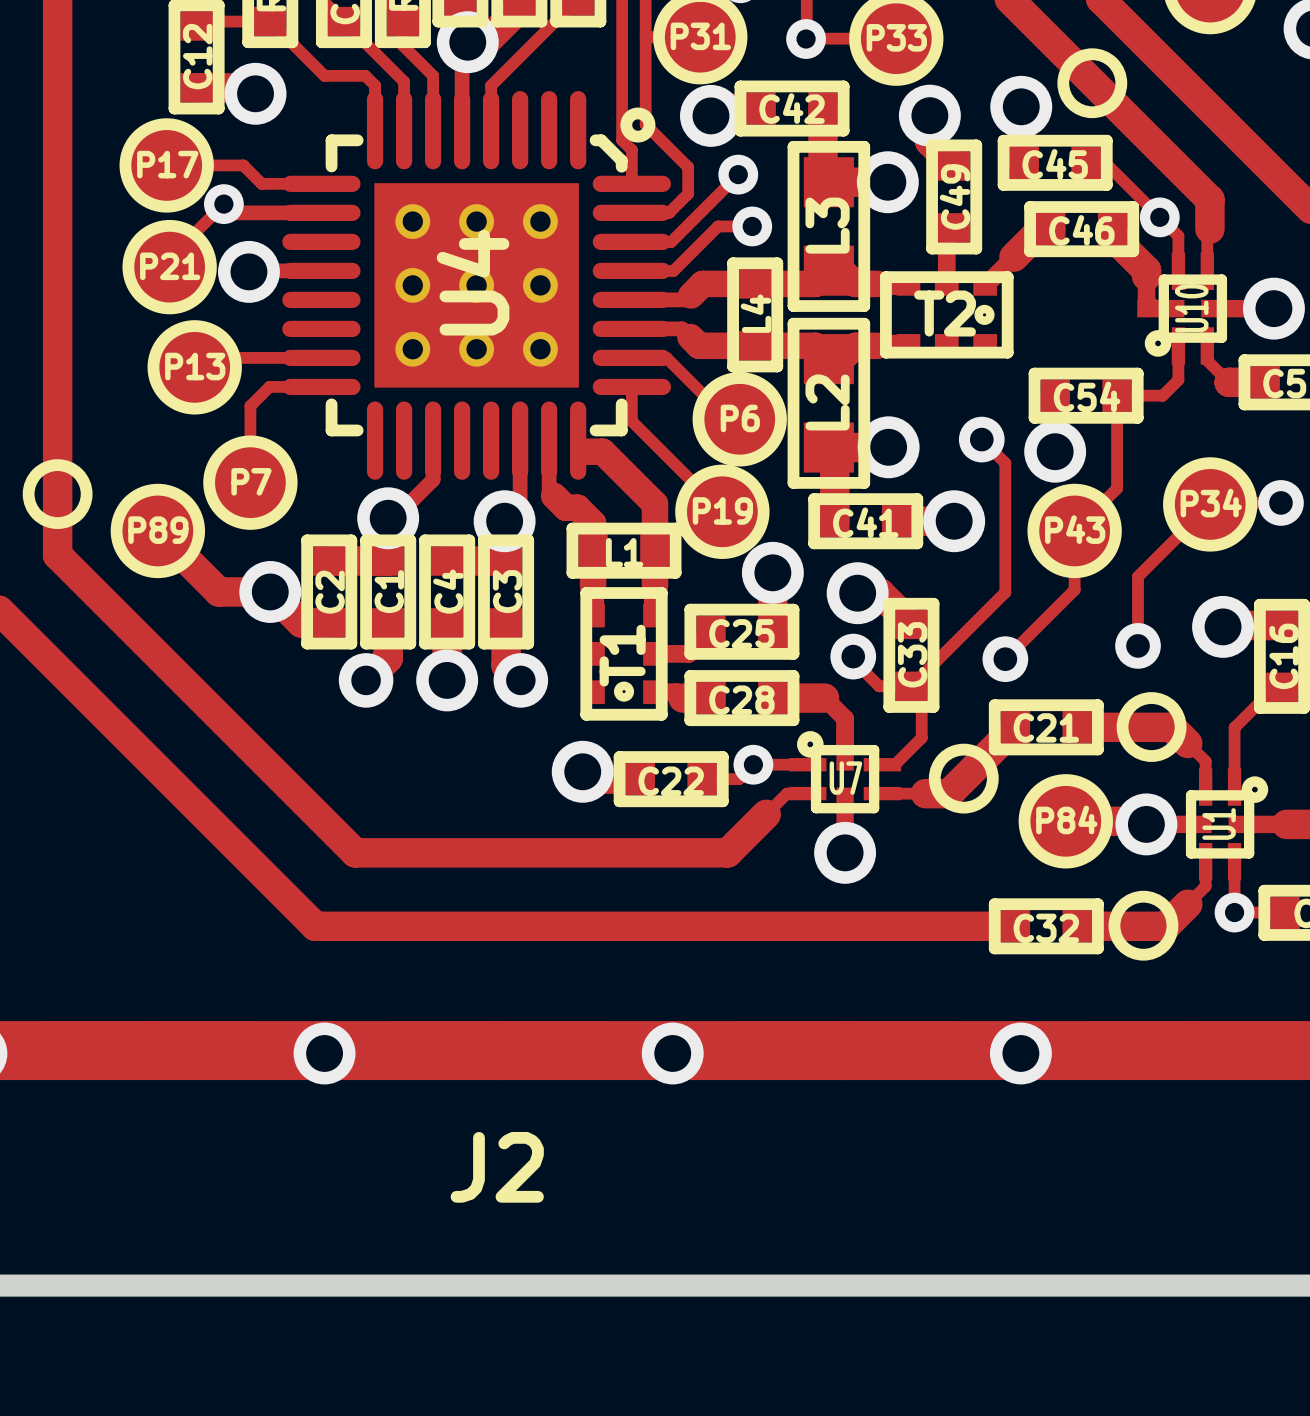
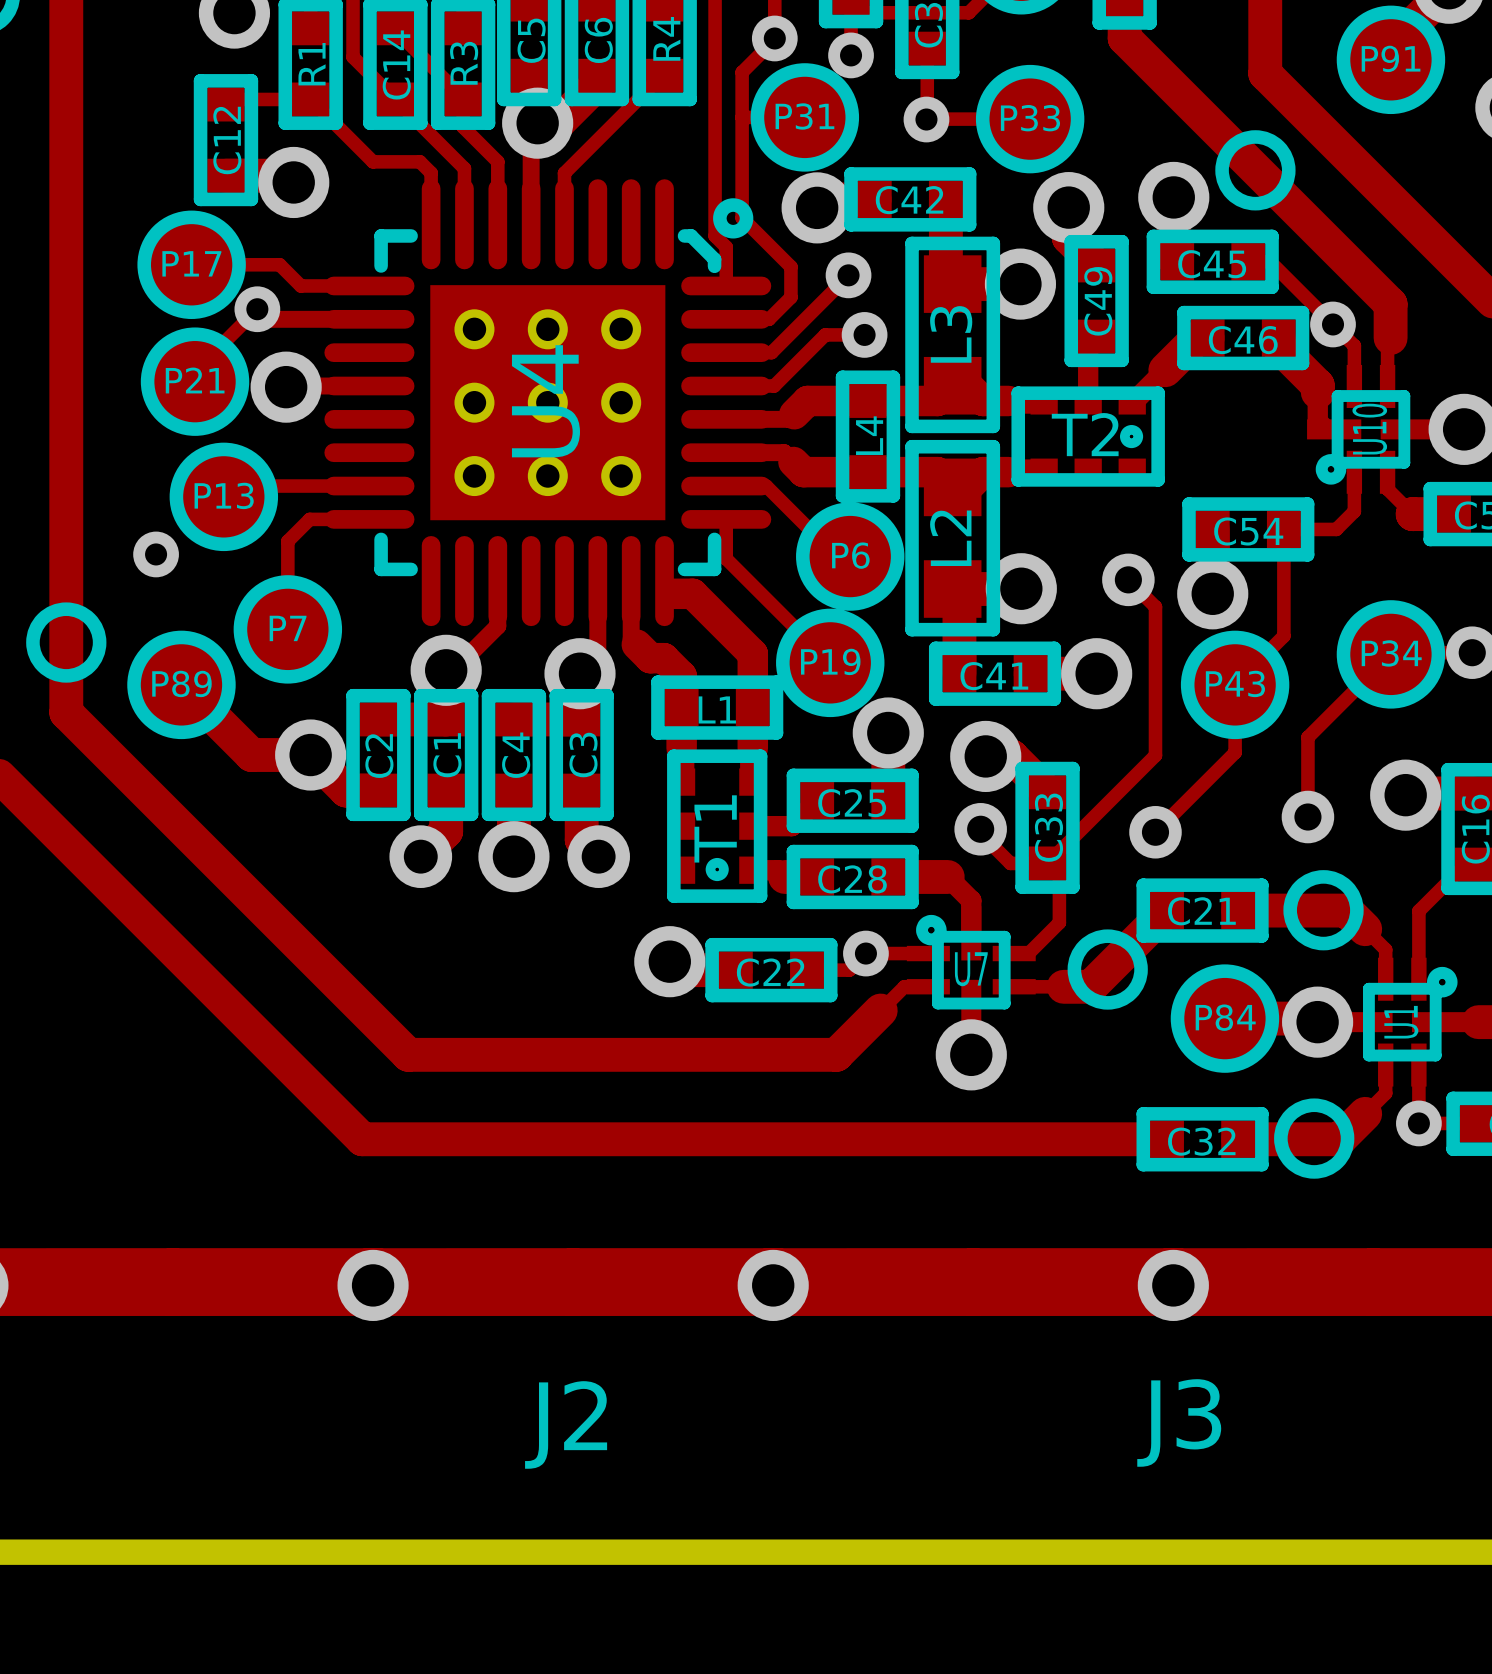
via: none -> (156, 554)
J3: none -> (1179, 1422)

